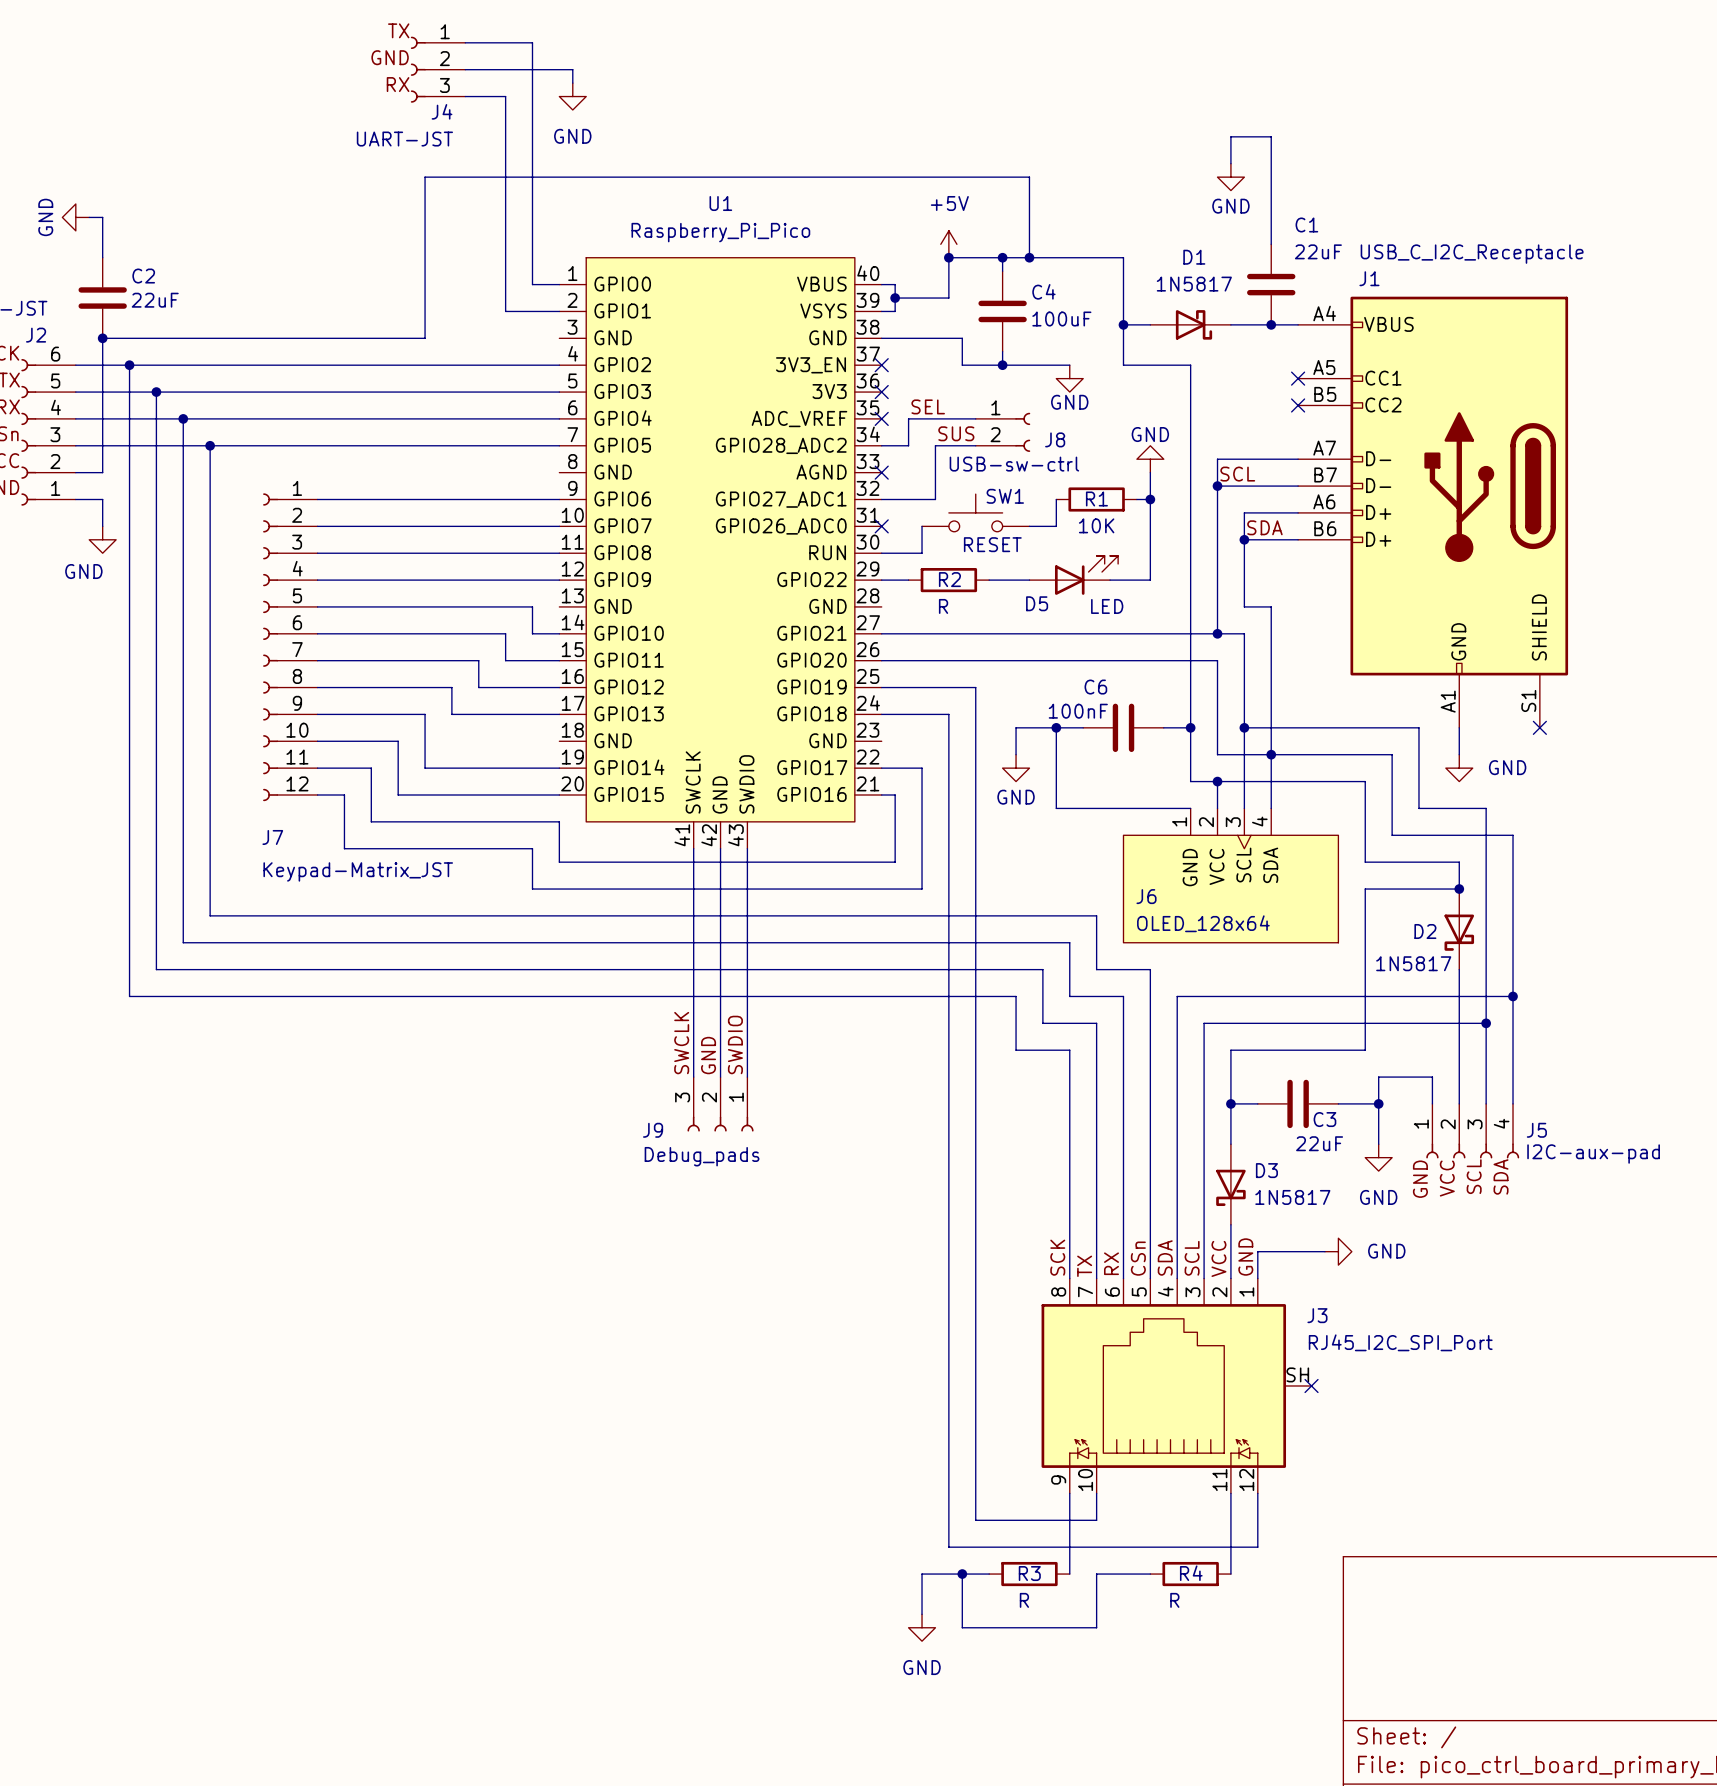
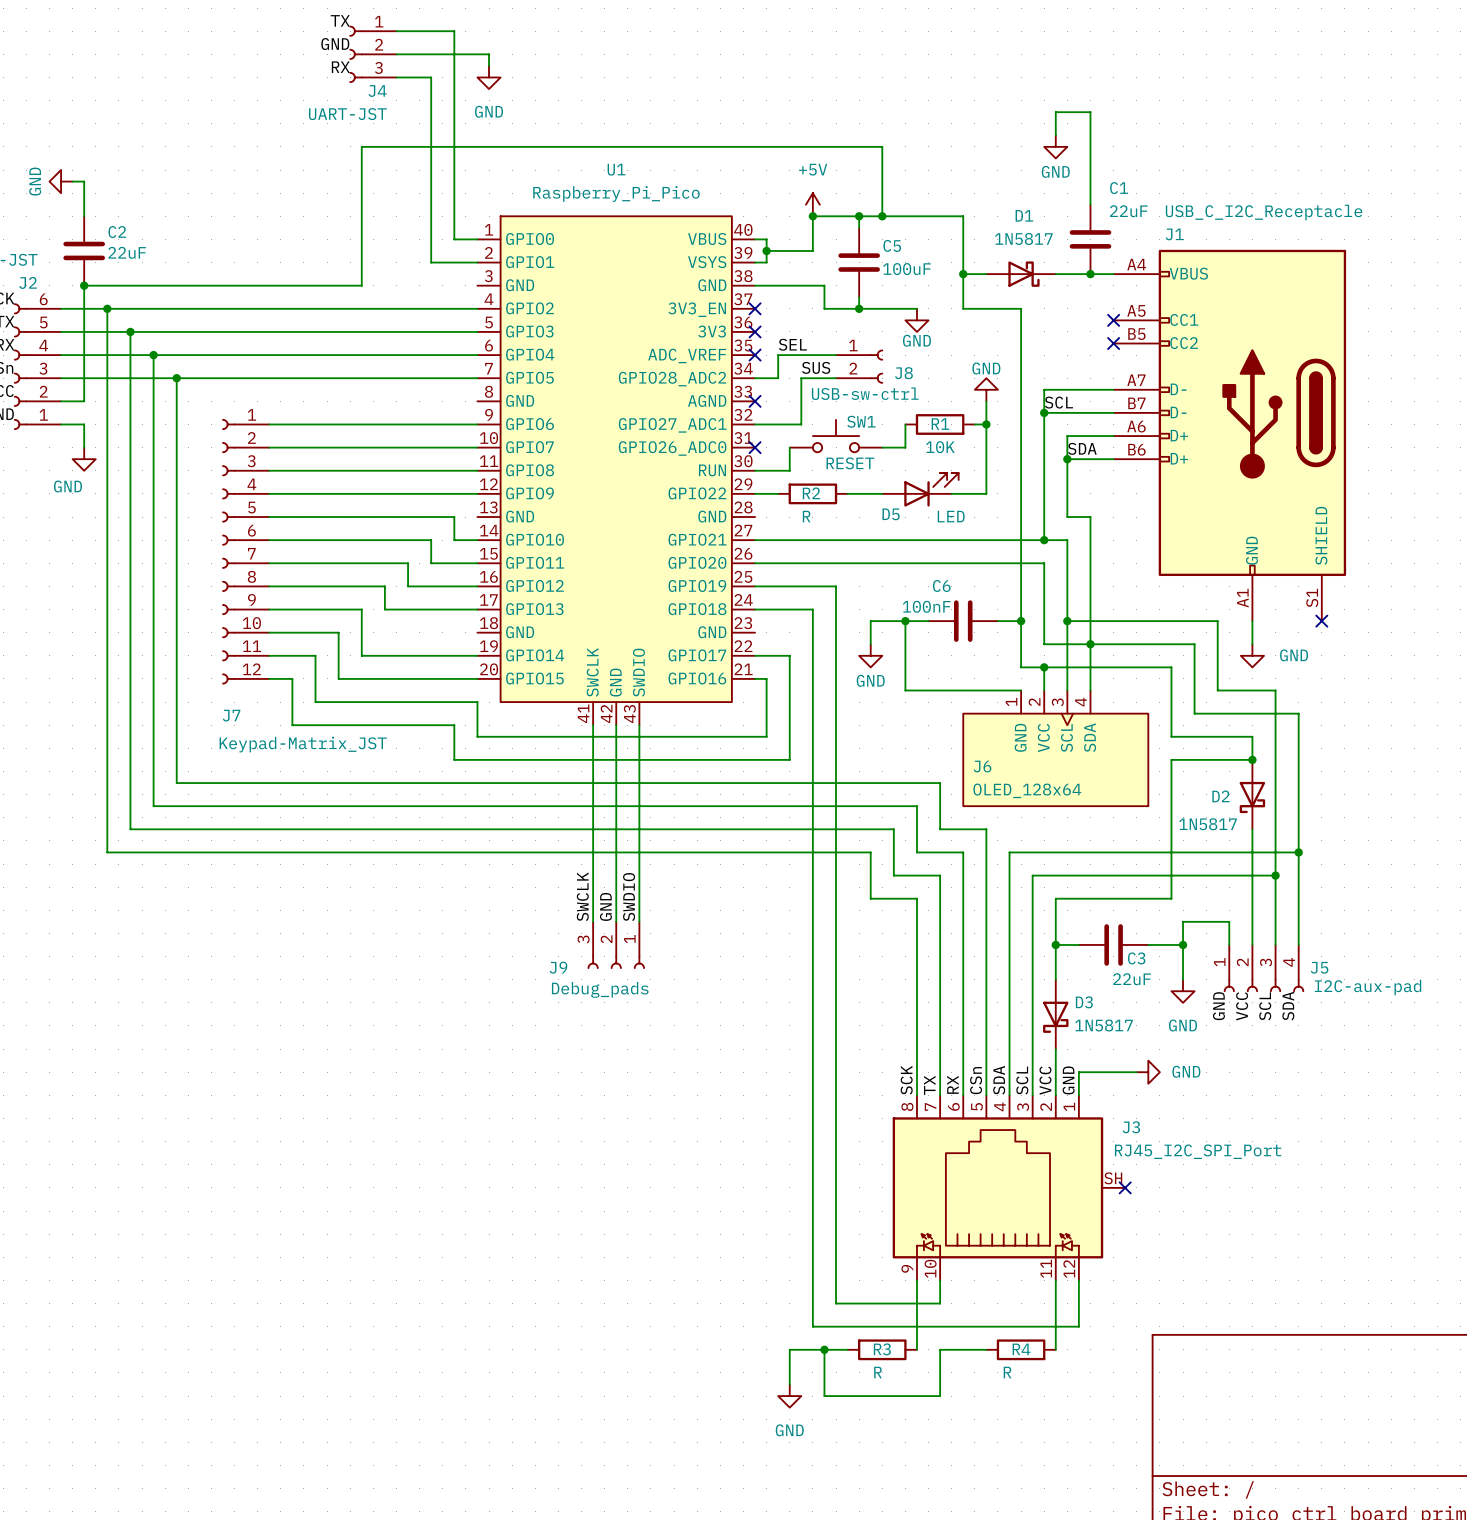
C4 name: C4 (1043, 291) -> C5 (892, 245)

